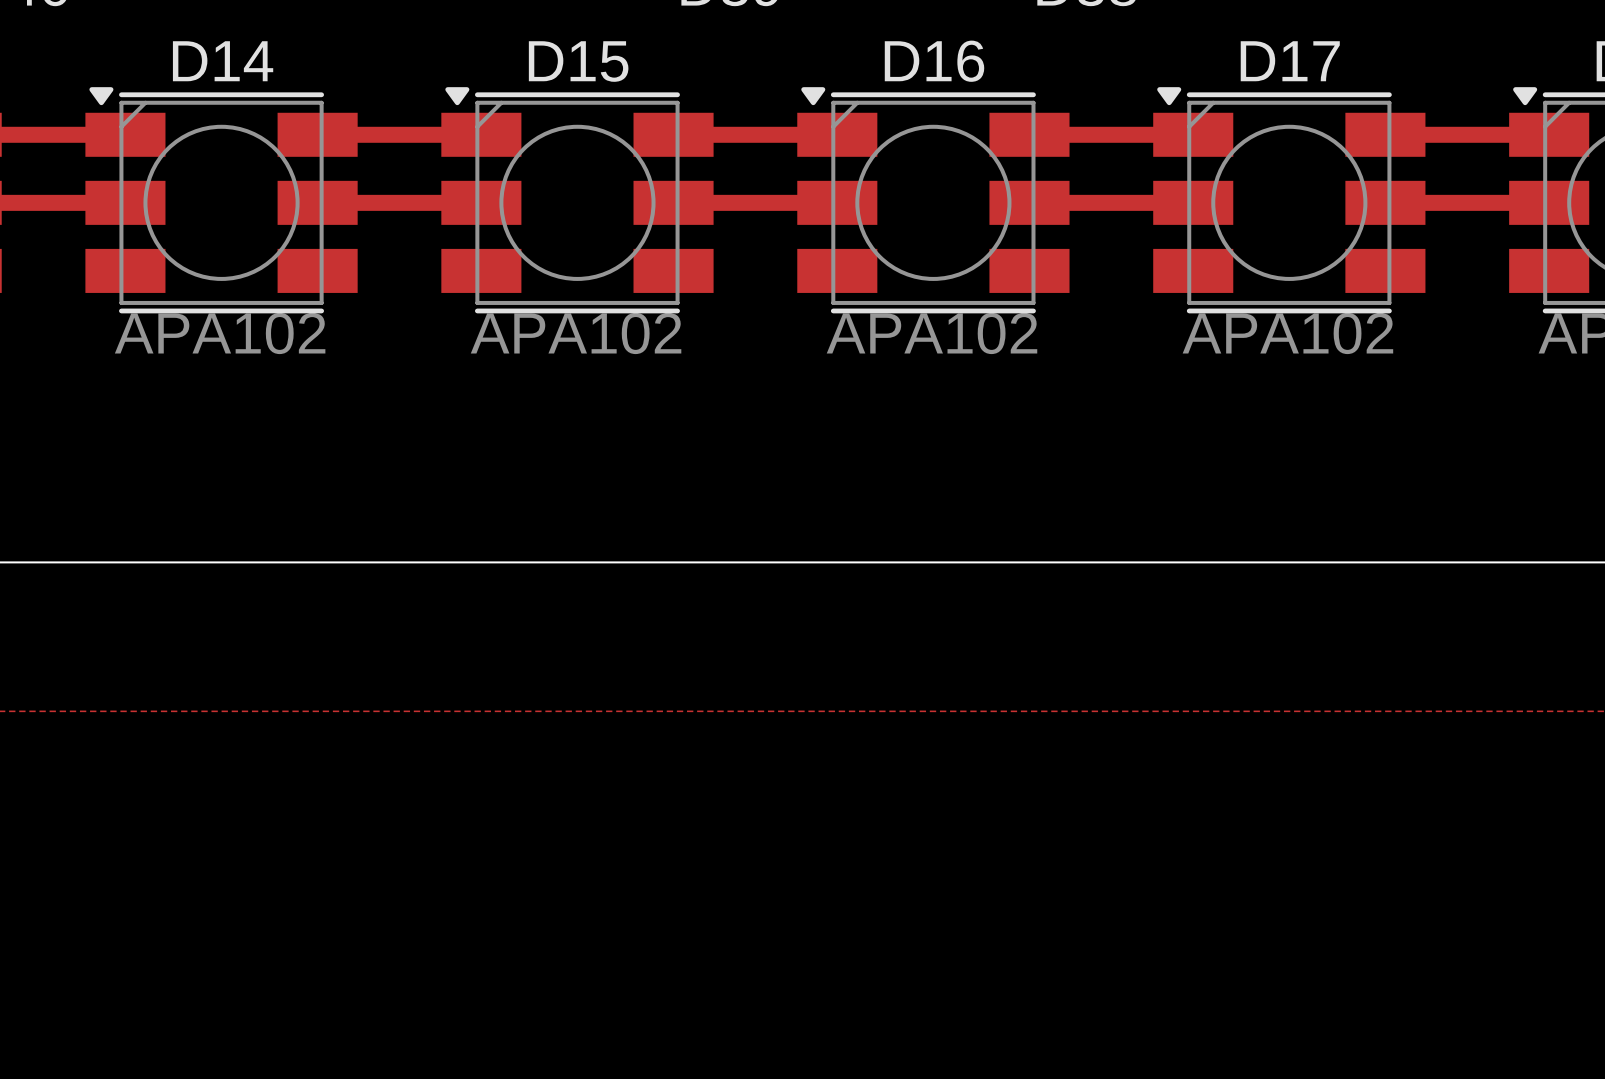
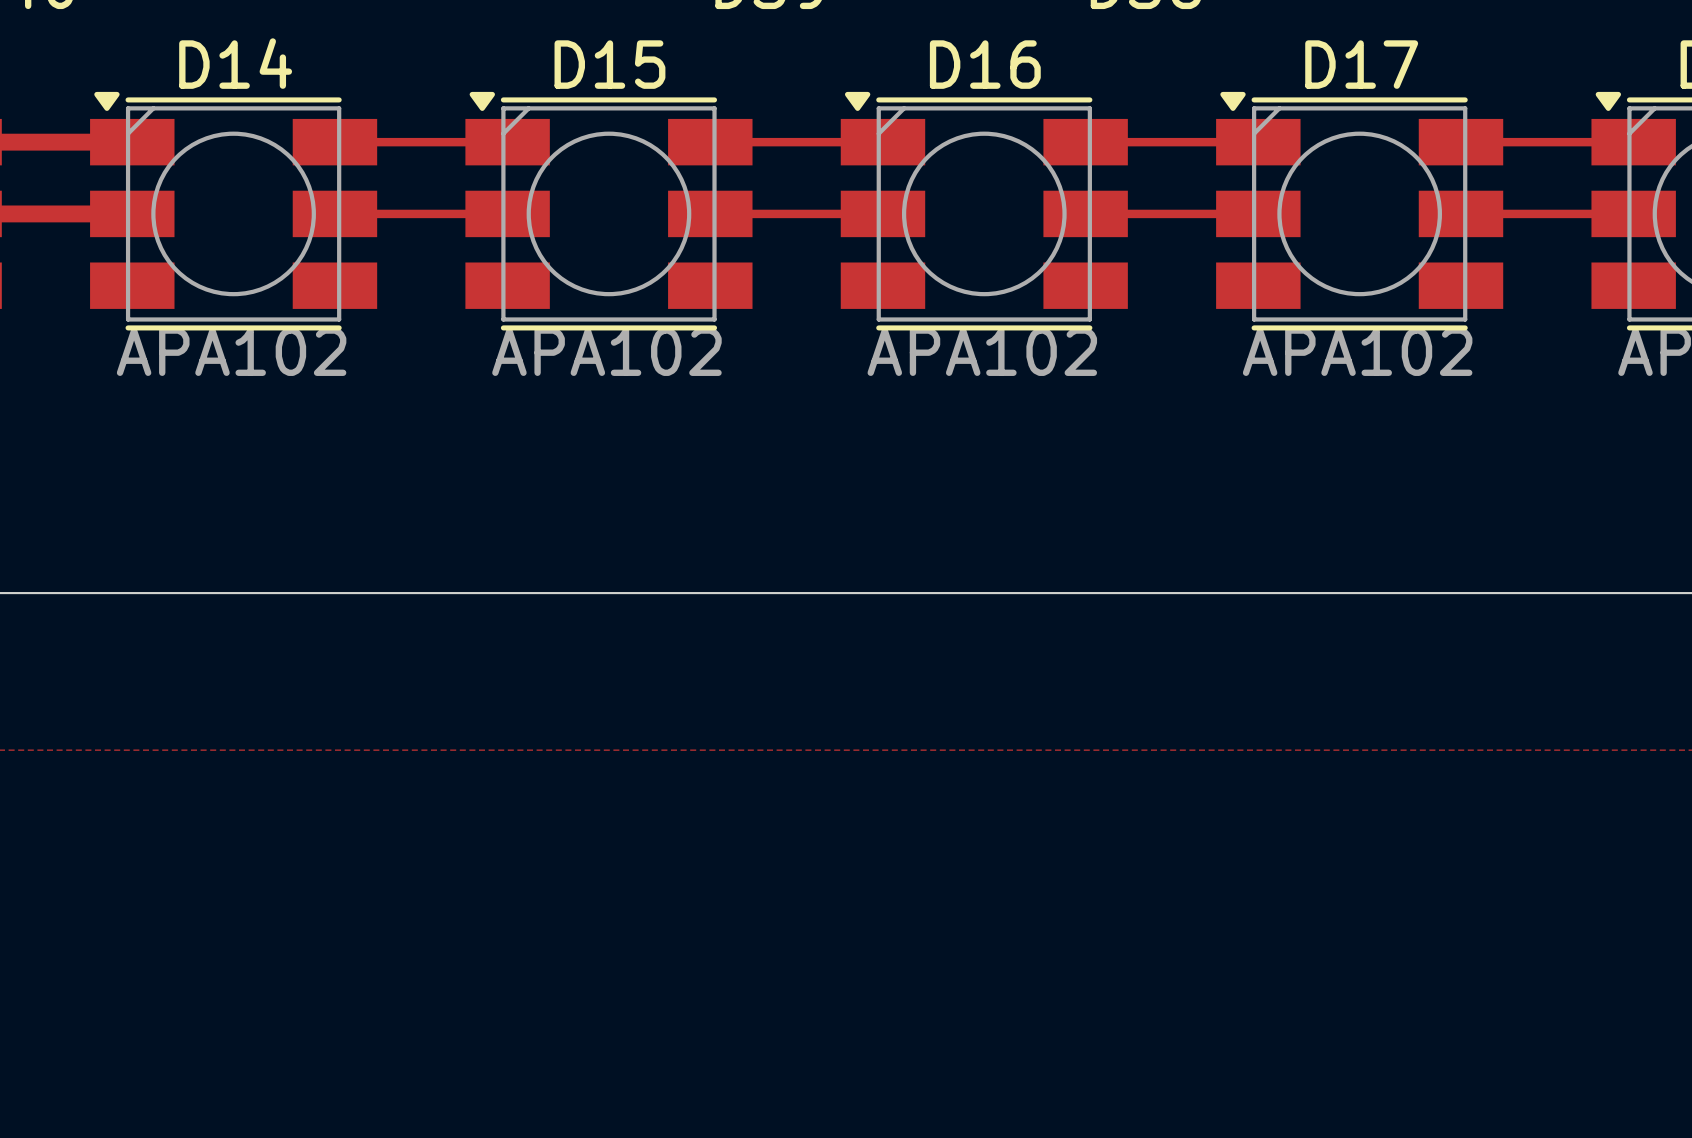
track width: thick (317, 134) (481, 134) -> thin (334, 142) (507, 142)
track width: thick (673, 134) (837, 134) -> thin (710, 142) (882, 142)
track width: thick (1029, 134) (1193, 134) -> thin (1085, 142) (1258, 142)
track width: thick (1385, 134) (1549, 134) -> thin (1460, 142) (1633, 142)
track width: thick (317, 202) (481, 202) -> thin (334, 213) (507, 213)
track width: thick (673, 202) (837, 202) -> thin (710, 213) (882, 213)
track width: thick (1029, 202) (1193, 202) -> thin (1085, 213) (1258, 213)
track width: thick (1385, 202) (1549, 202) -> thin (1460, 213) (1633, 213)

